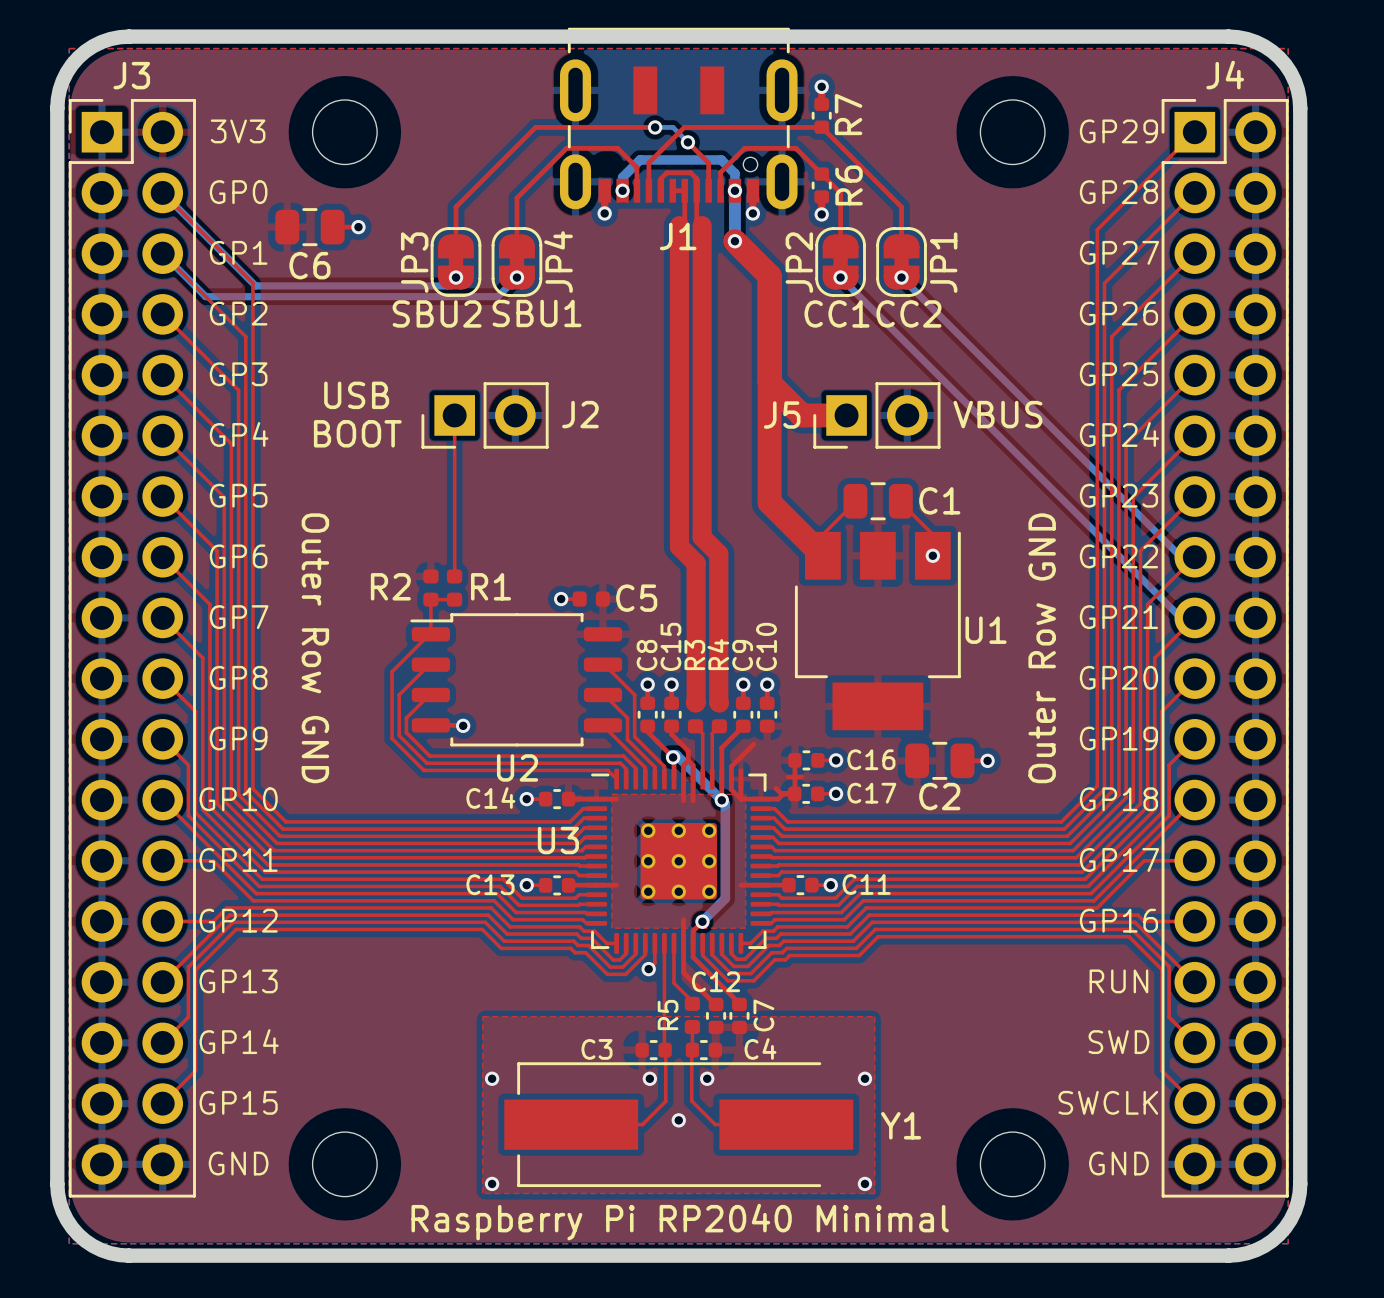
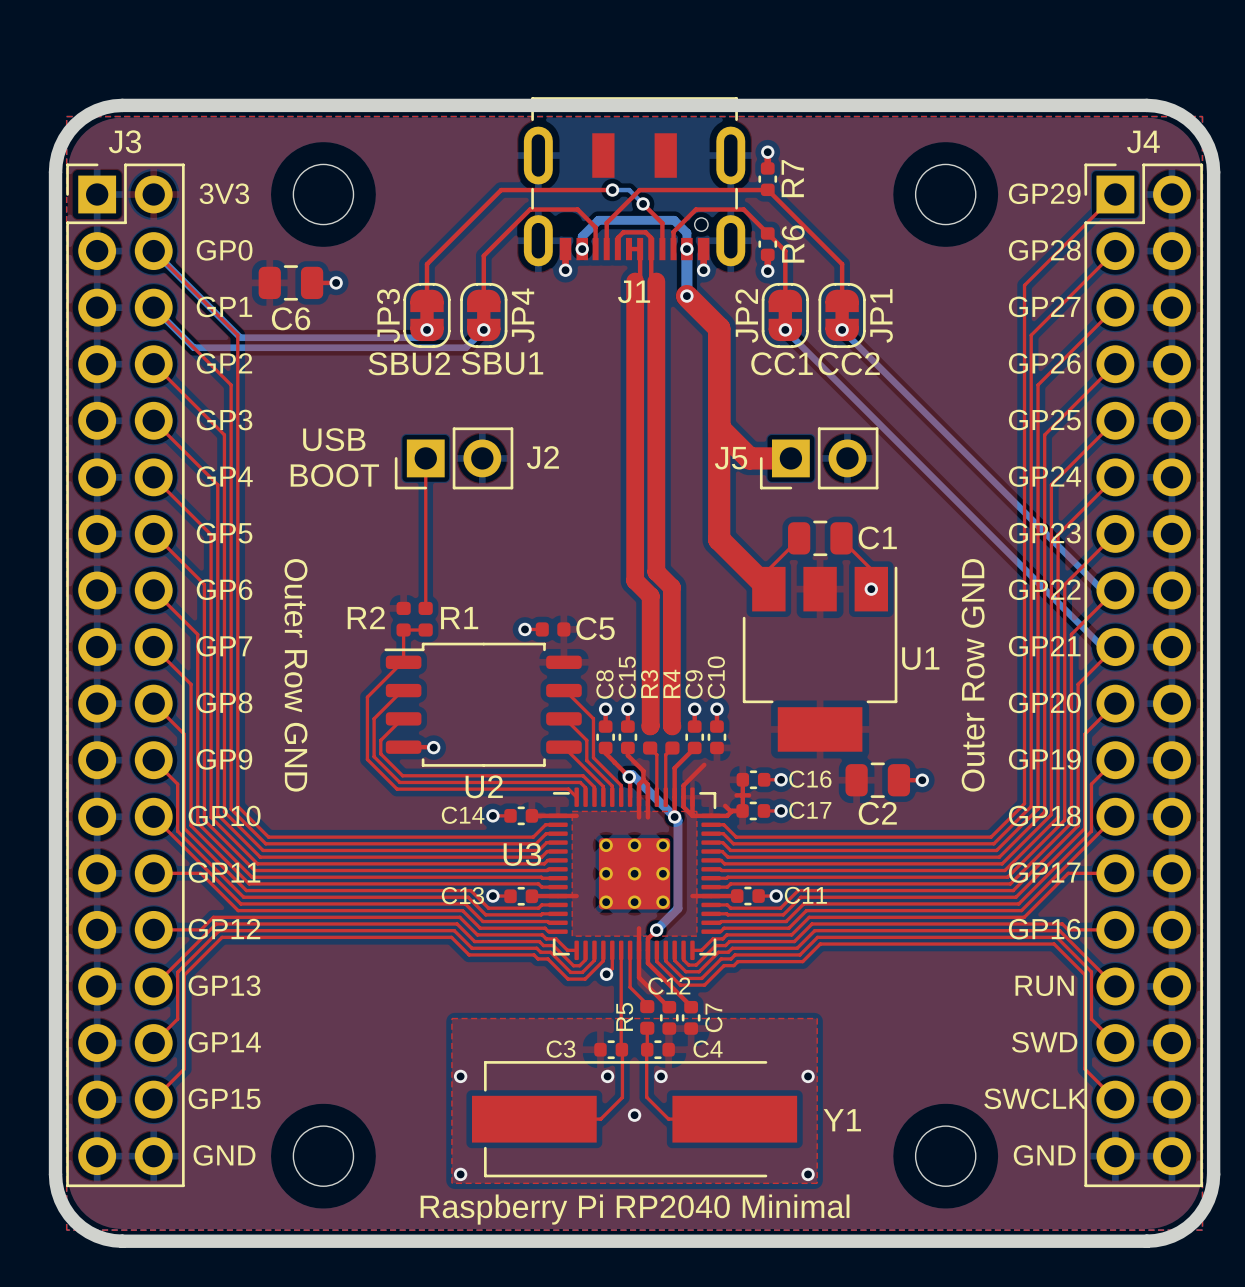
text: VBUS (997, 414) -> none

